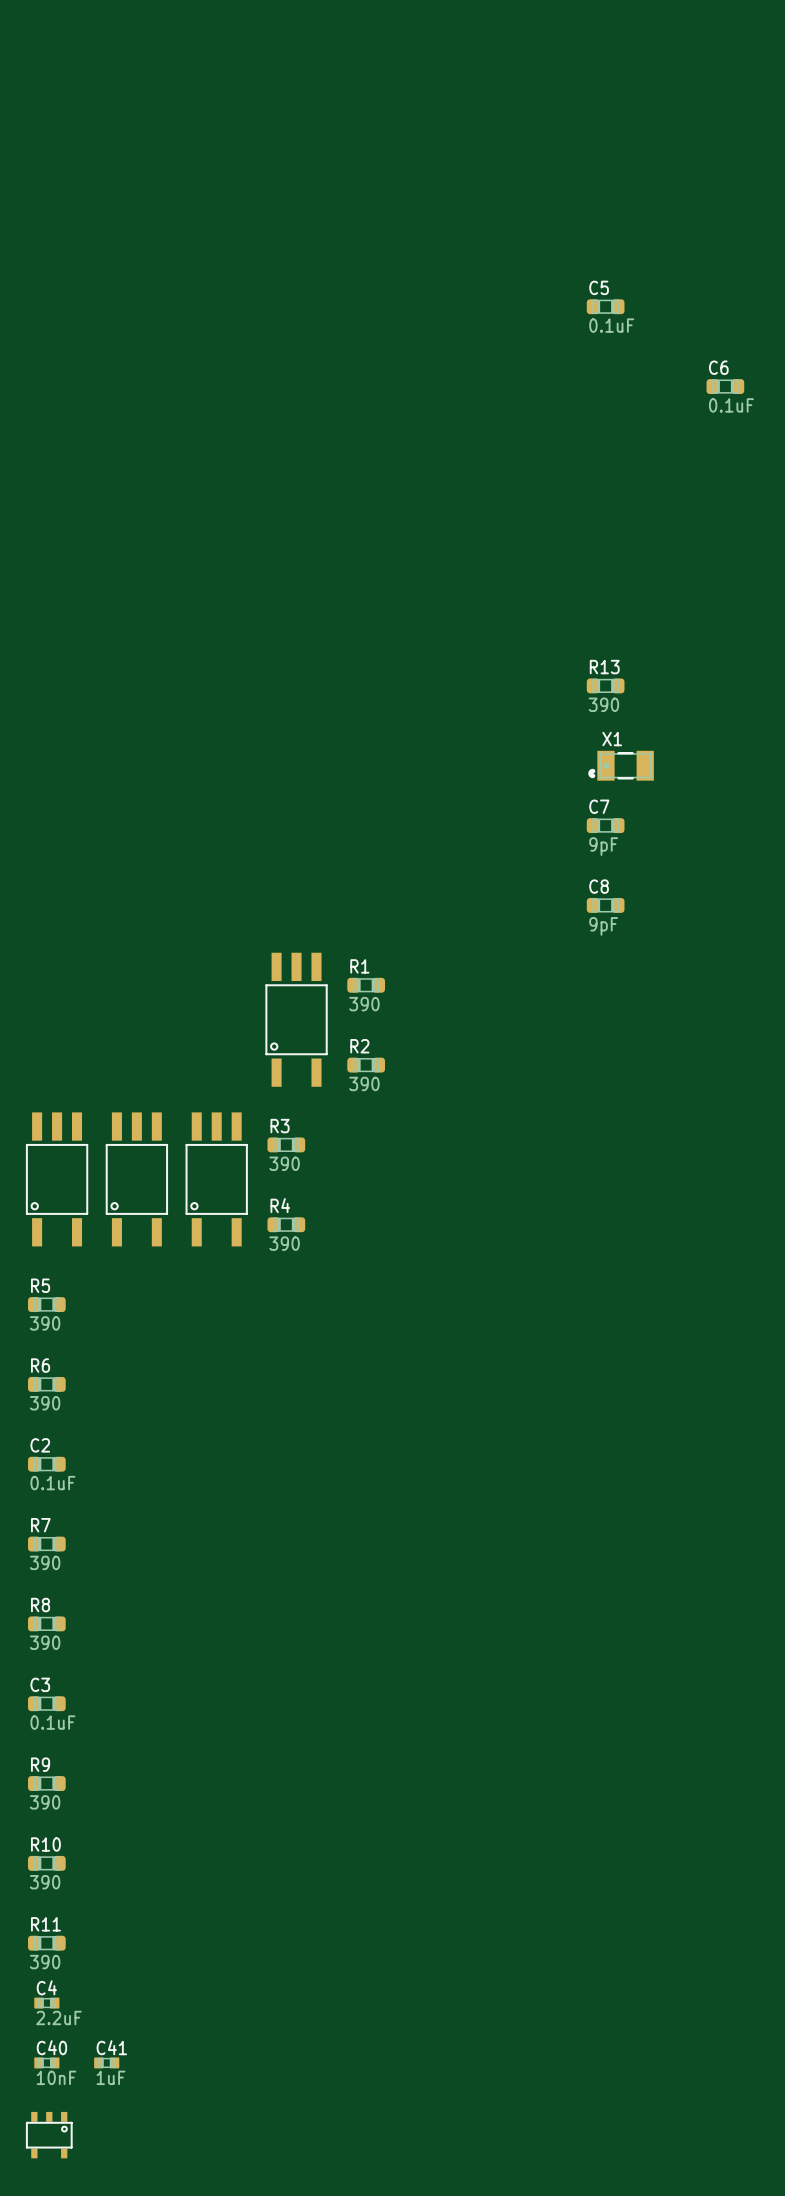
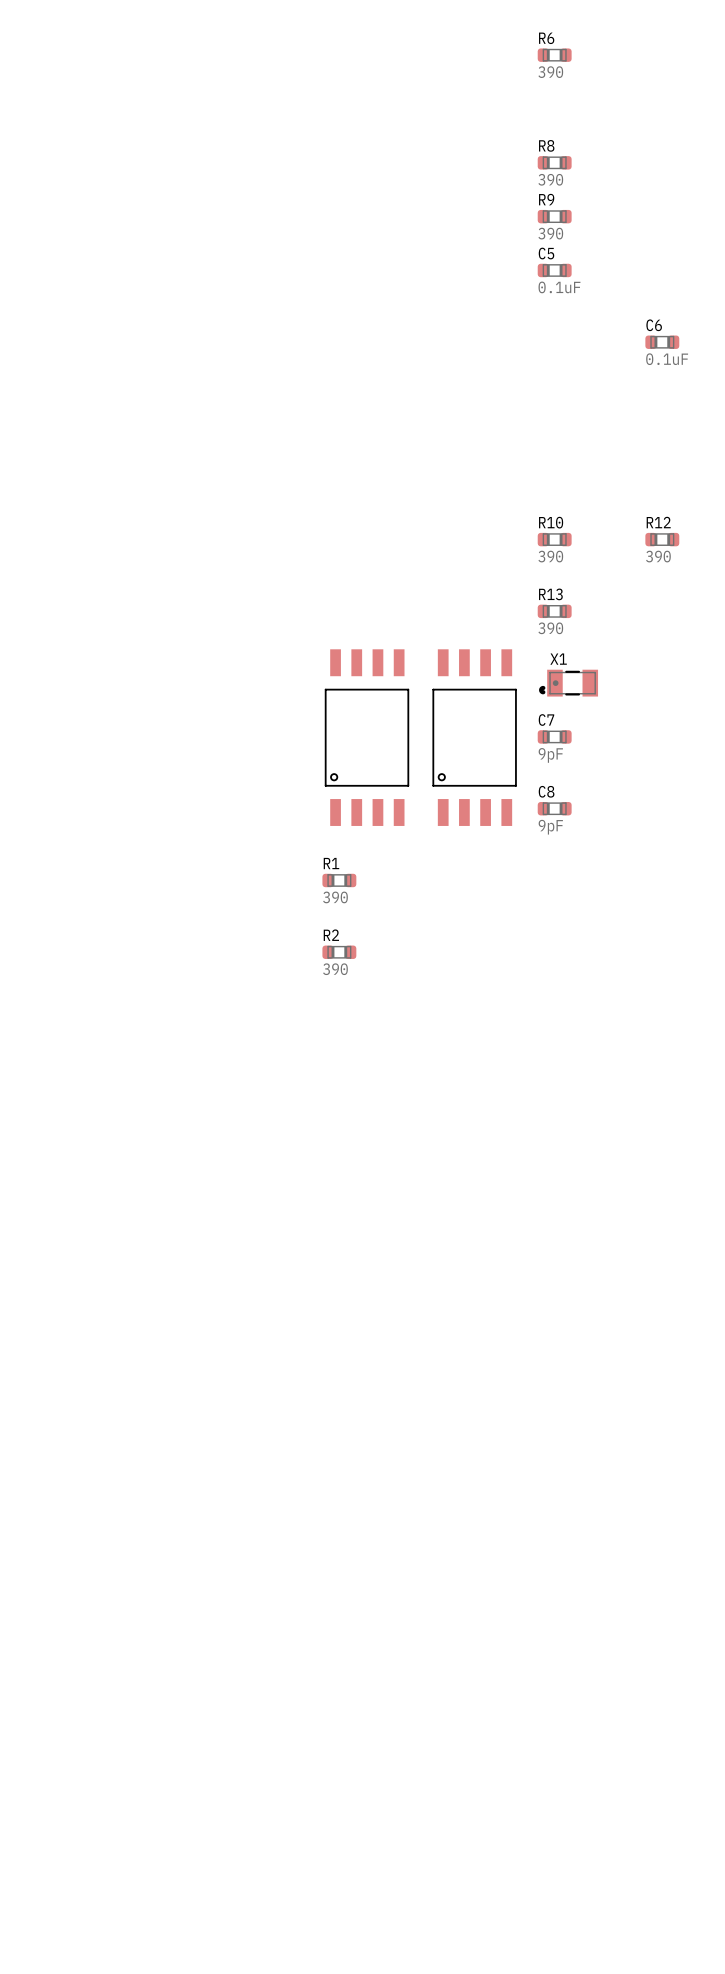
R12: none -> 390 (662, 539)
part: none -> (366, 737)
part: none -> (474, 737)
part: (296, 1019) -> none
R3: 390 (286, 1144) -> none
part: (57, 1179) -> none
part: (136, 1179) -> none
part: (216, 1179) -> none
R4: 390 (286, 1224) -> none
R5: 390 (46, 1304) -> none
R6 position: (46, 1384) -> (554, 55)
C2: 0.1uF (46, 1464) -> none
R7: 390 (46, 1544) -> none
R8 position: (46, 1623) -> (554, 162)
C3: 0.1uF (46, 1703) -> none
R9 position: (46, 1783) -> (554, 216)
R10 position: (46, 1863) -> (554, 539)
R11: 390 (46, 1943) -> none
C4: 2.2uF (46, 2003) -> none
C40: 10nF (46, 2062) -> none
C41: 1uF (106, 2062) -> none
part: (49, 2135) -> none

